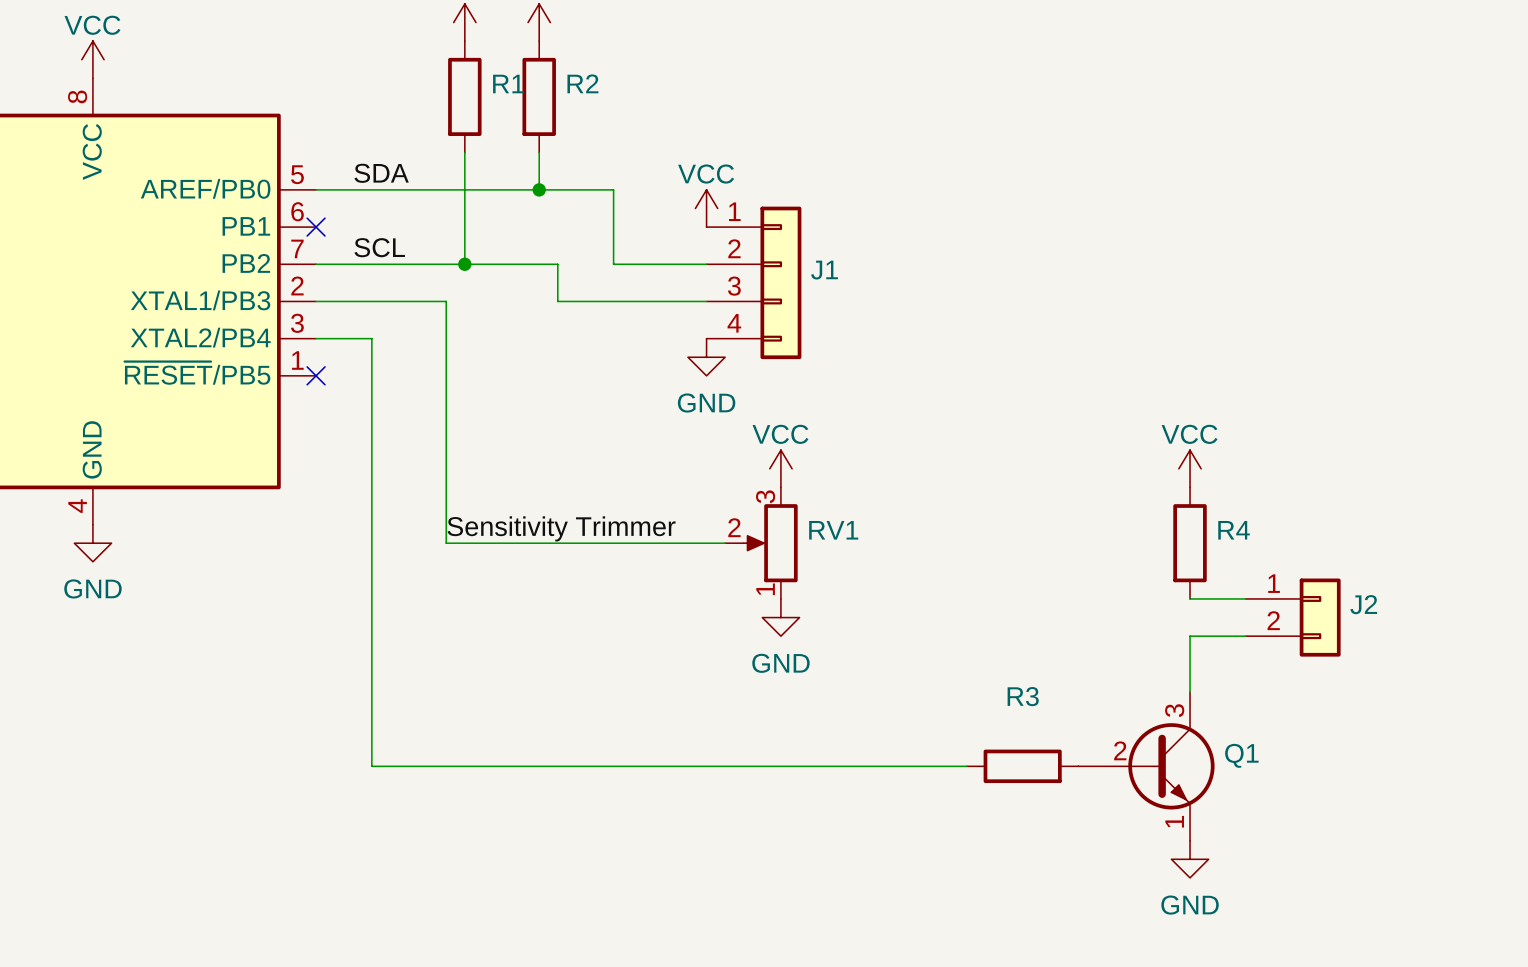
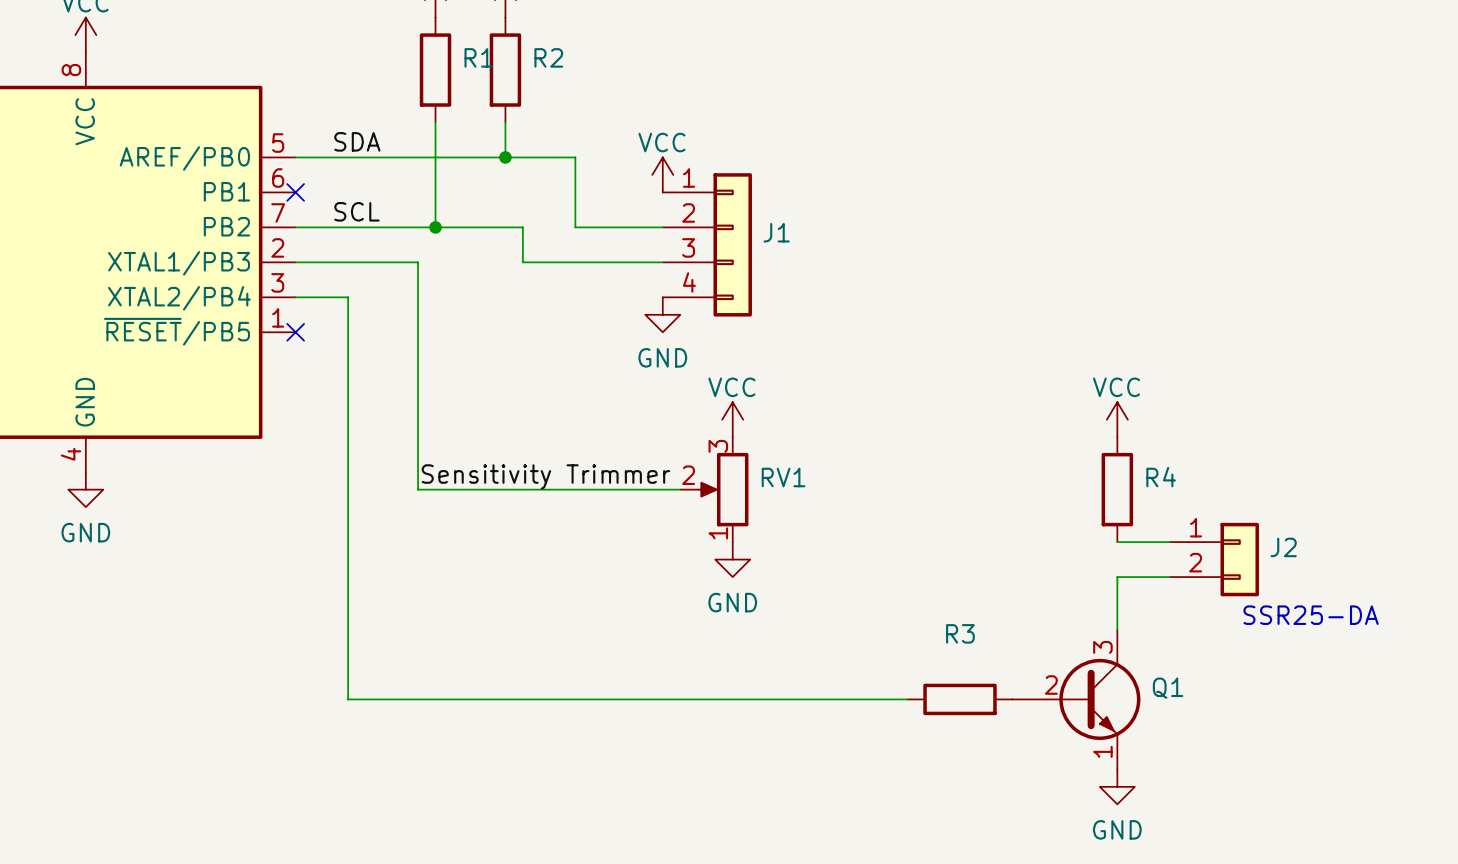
text: none -> SSR25-DA (1311, 615)

